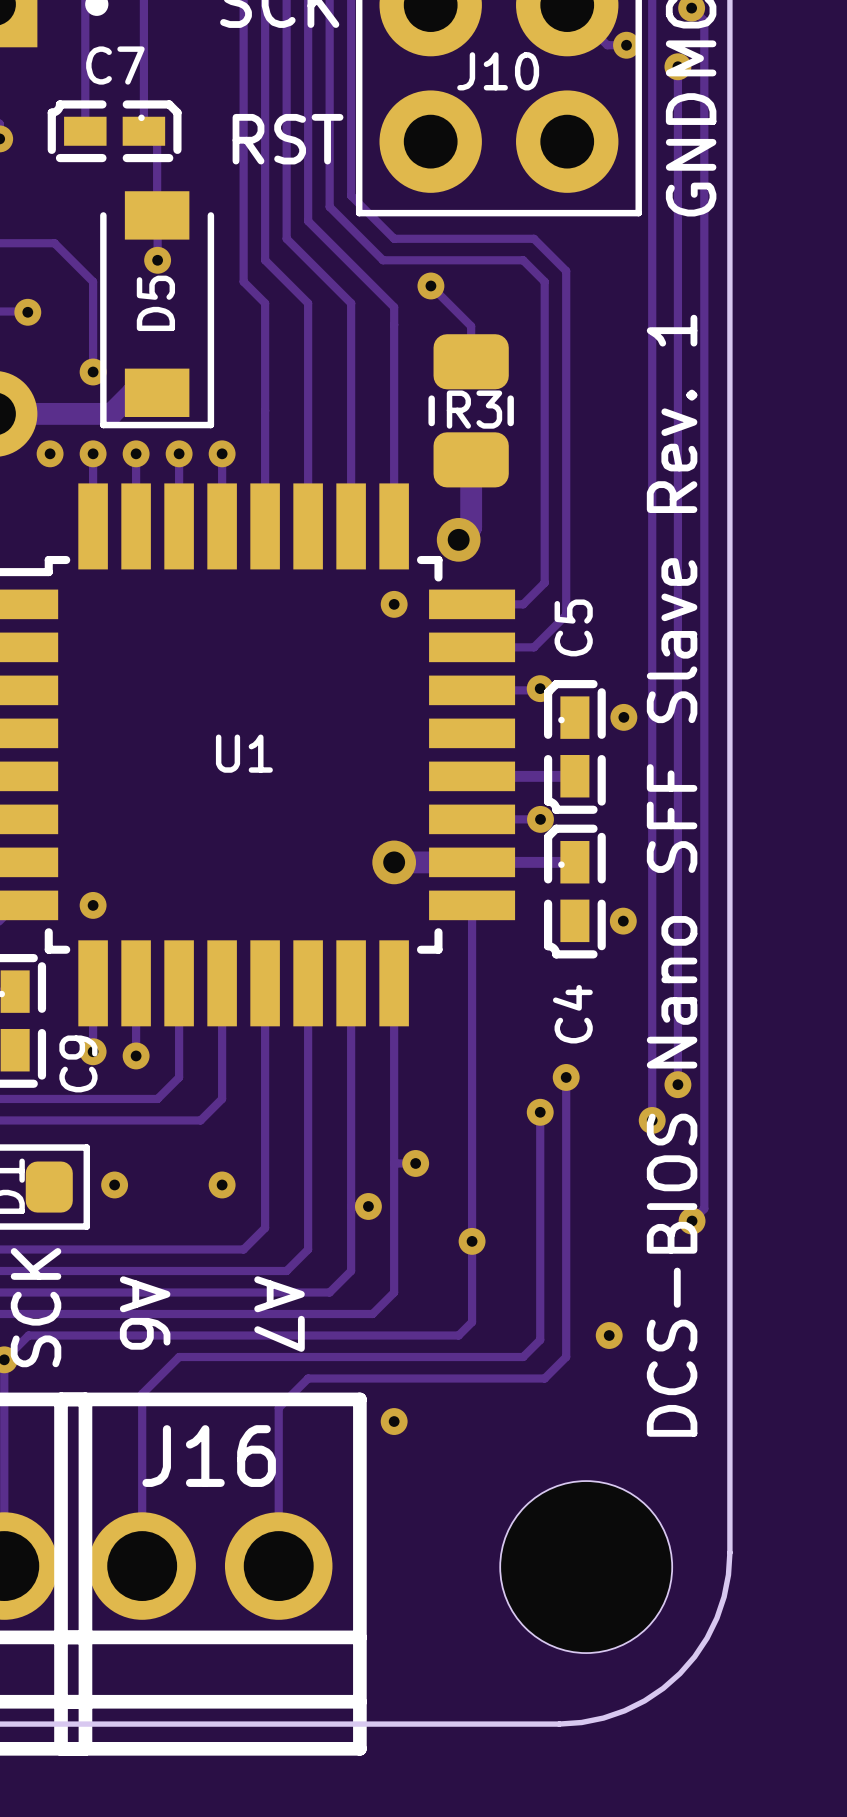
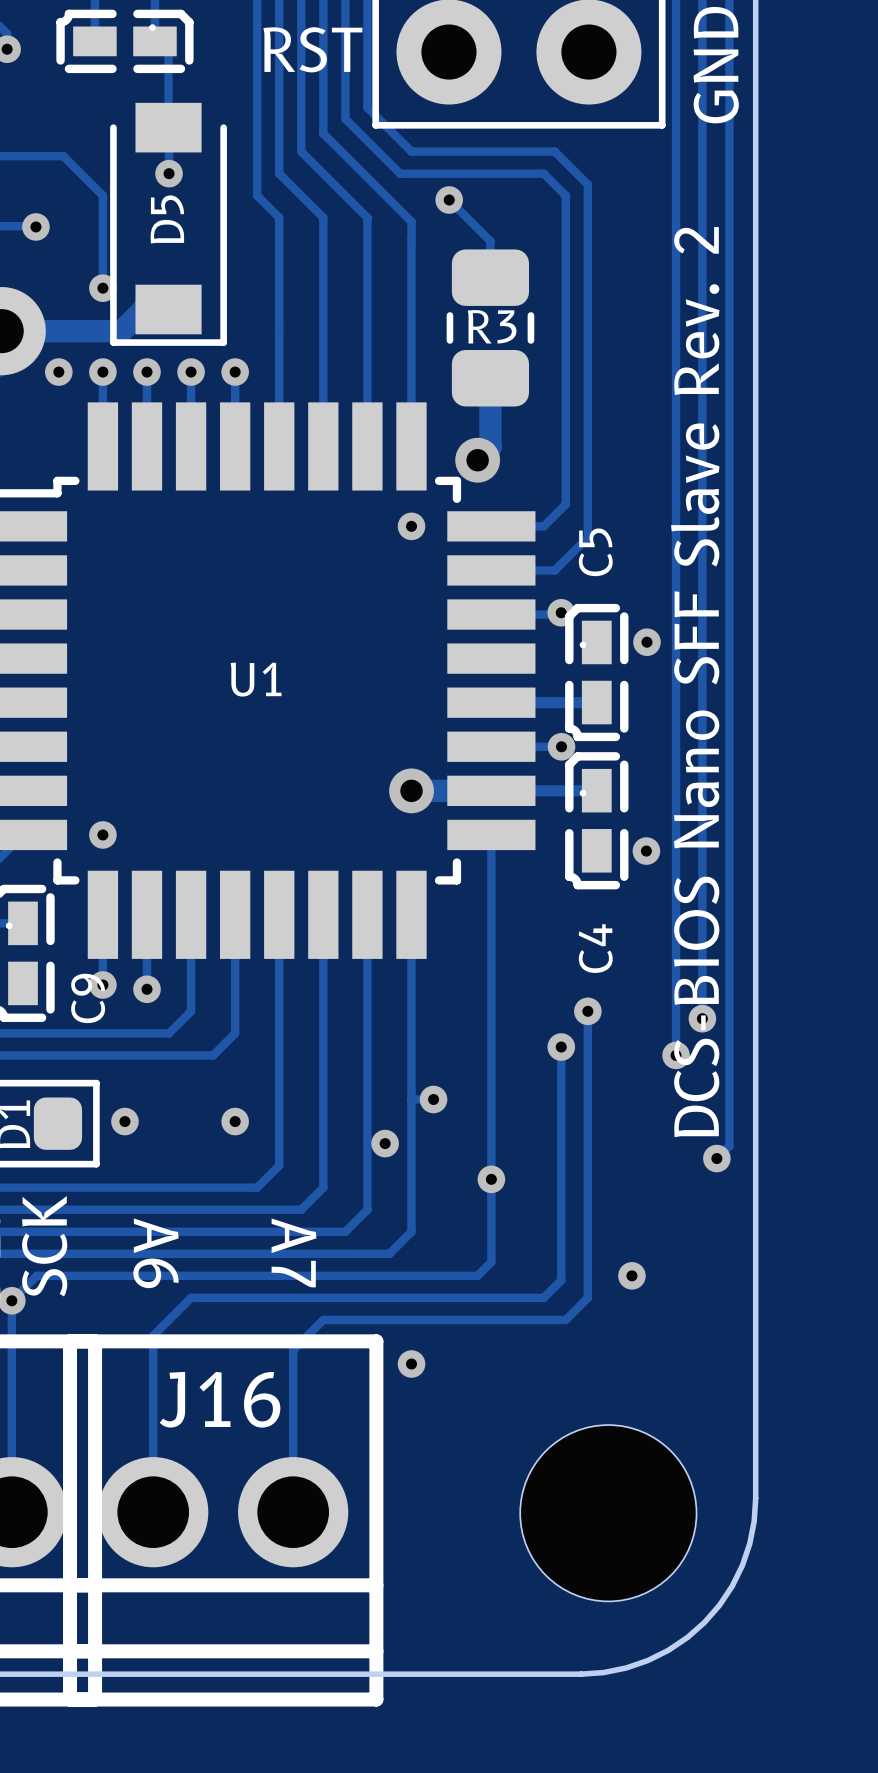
text: DCS-BIOS Nano SFF Slave Rev. 1 (672, 875) -> DCS-BIOS Nano SFF Slave Rev. 2 (695, 682)

